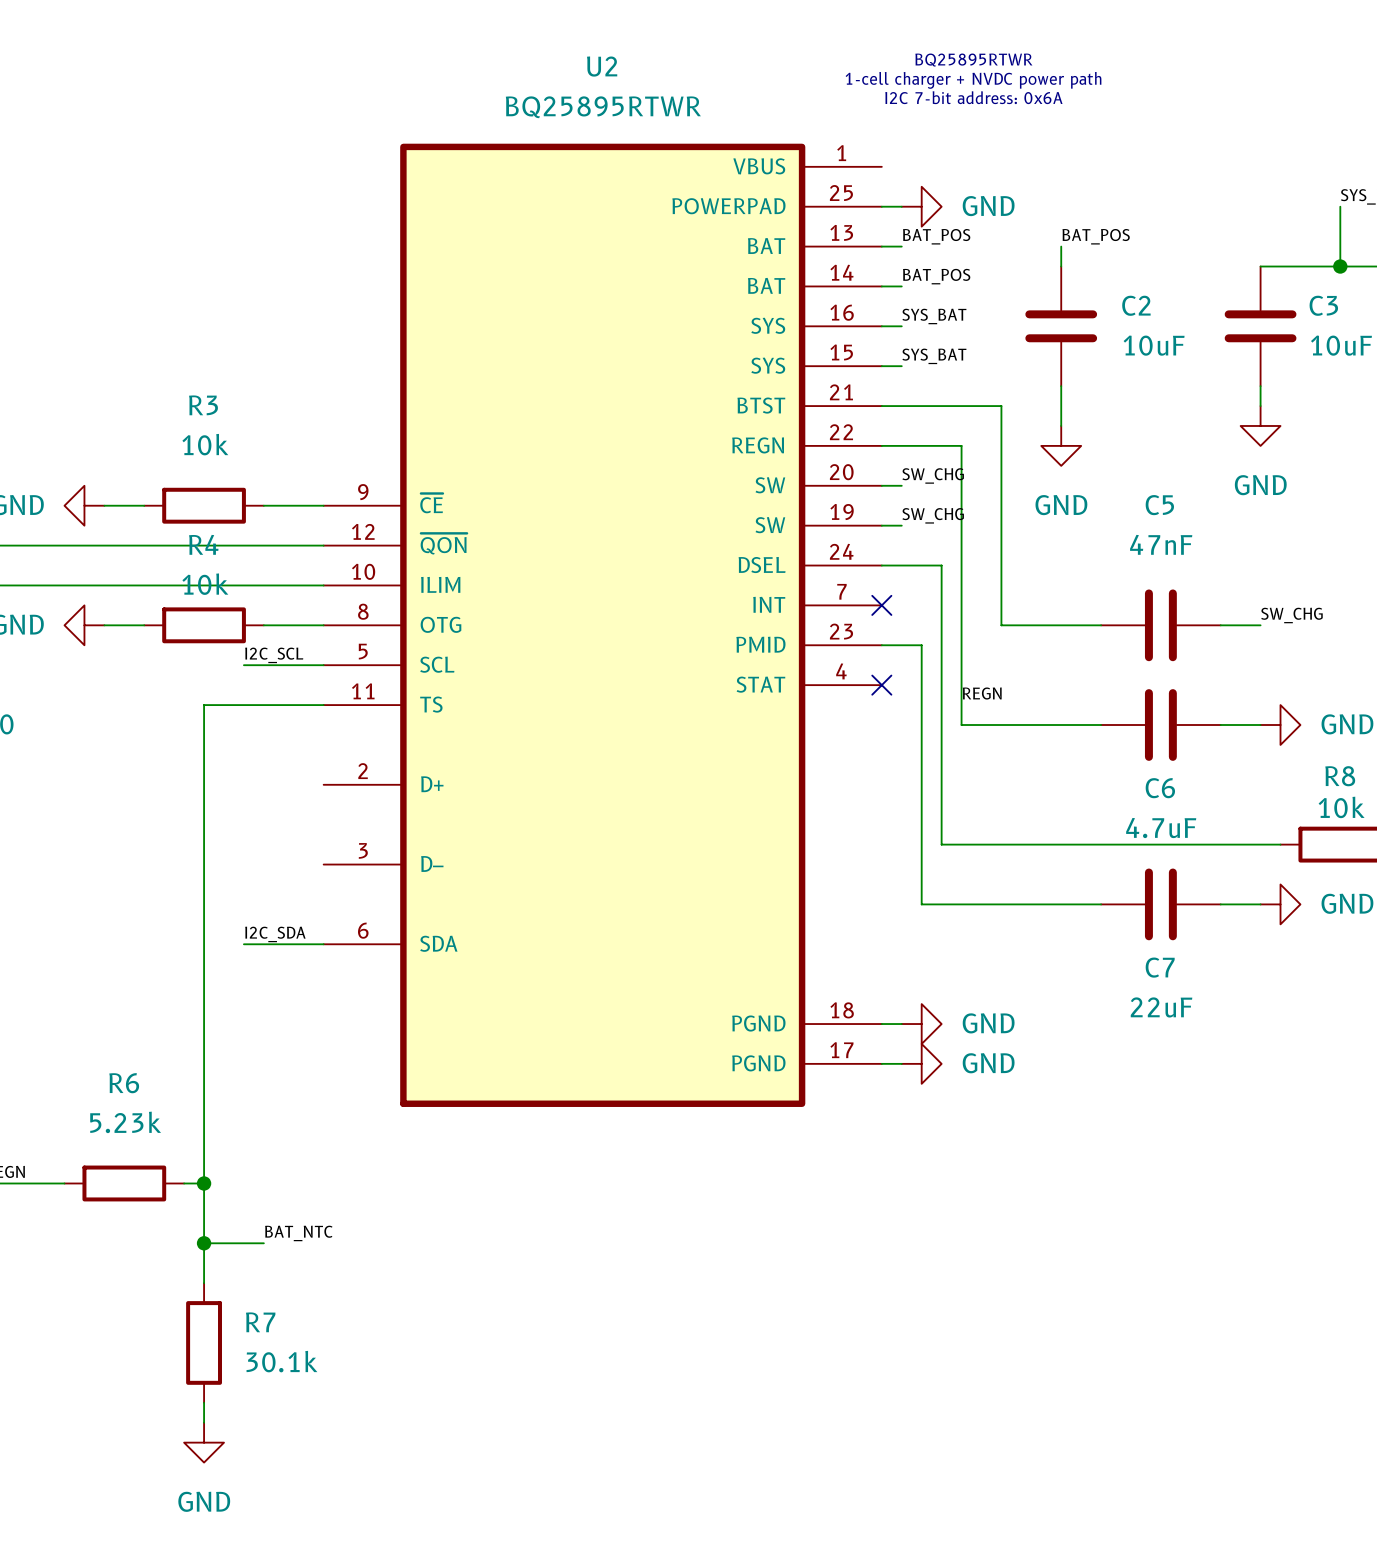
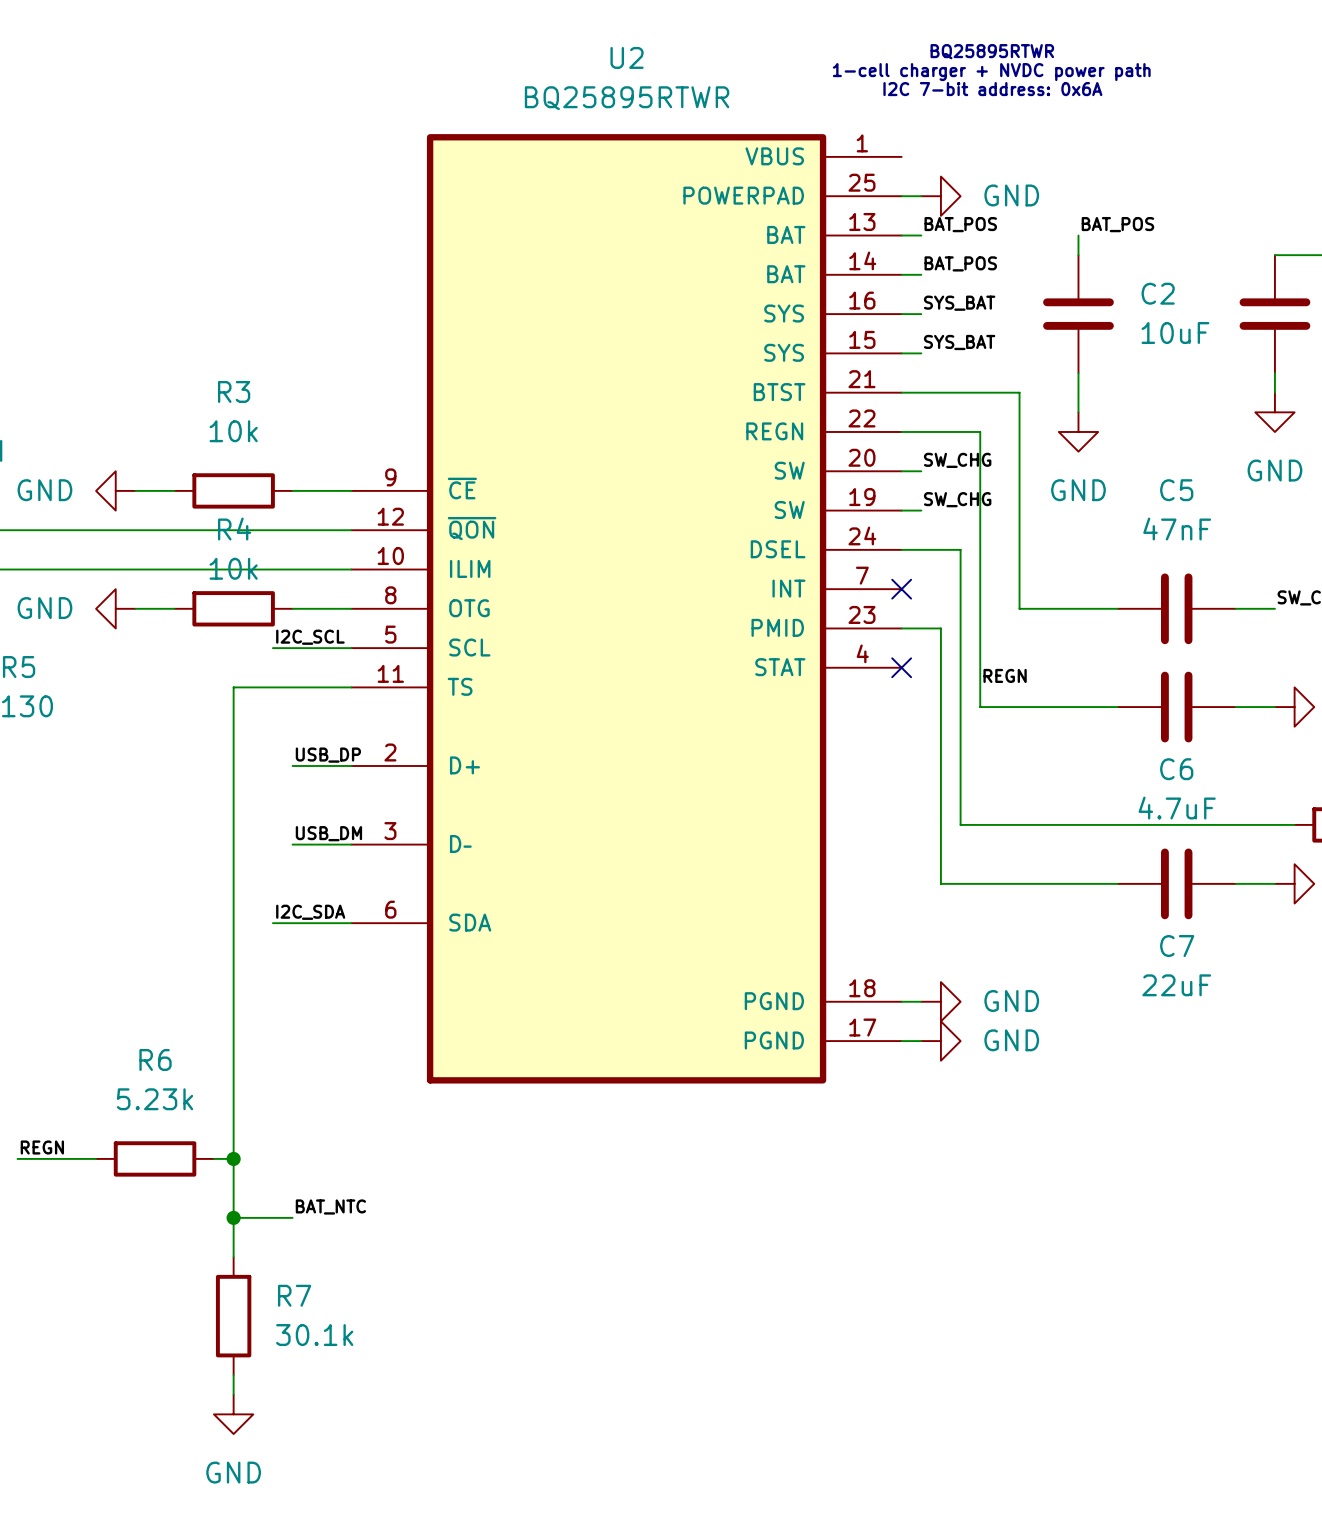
label: none -> USB_DP (328, 755)
wire: none -> (292, 765) (351, 765)
label: none -> USB_DM (328, 833)
wire: none -> (292, 844) (351, 844)

